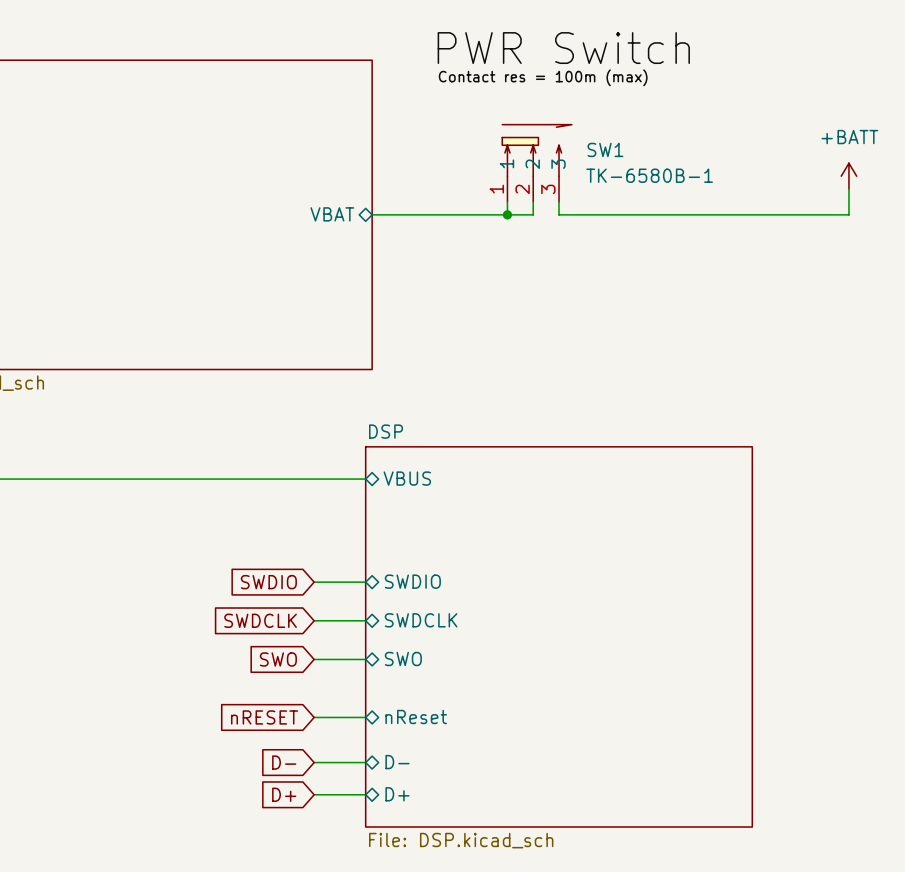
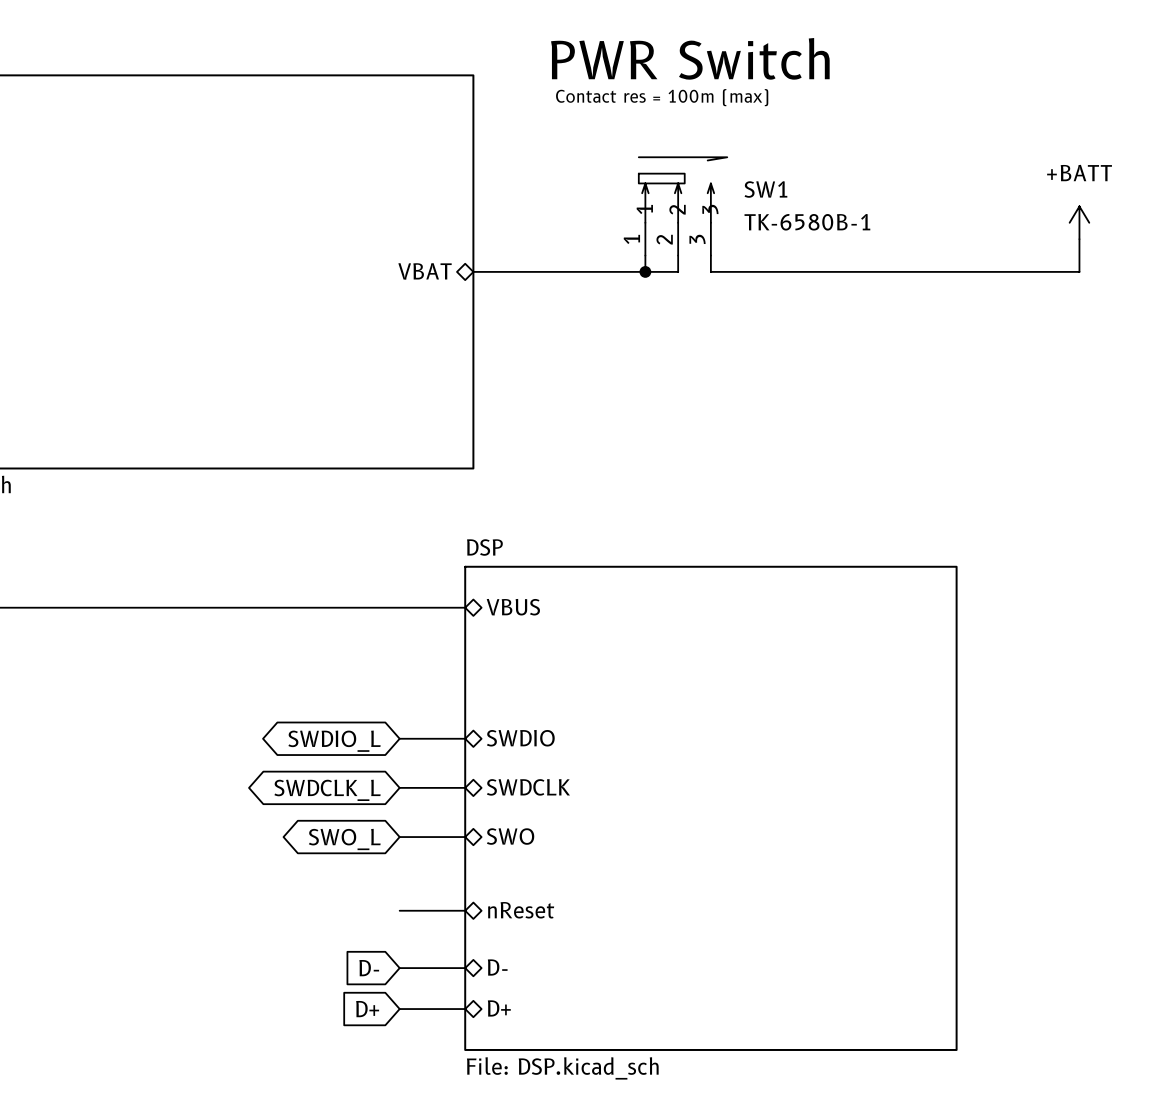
global label shape: input (268, 582) -> bidirectional (334, 741)
global label: SWDIO (268, 582) -> SWDIO_L (334, 741)
global label shape: input (260, 620) -> bidirectional (327, 790)
global label: SWDCLK (260, 620) -> SWDCLK_L (327, 790)
global label shape: input (278, 659) -> bidirectional (344, 839)
global label: SWO (278, 659) -> SWO_L (344, 839)
global label: nRESET (264, 717) -> none

